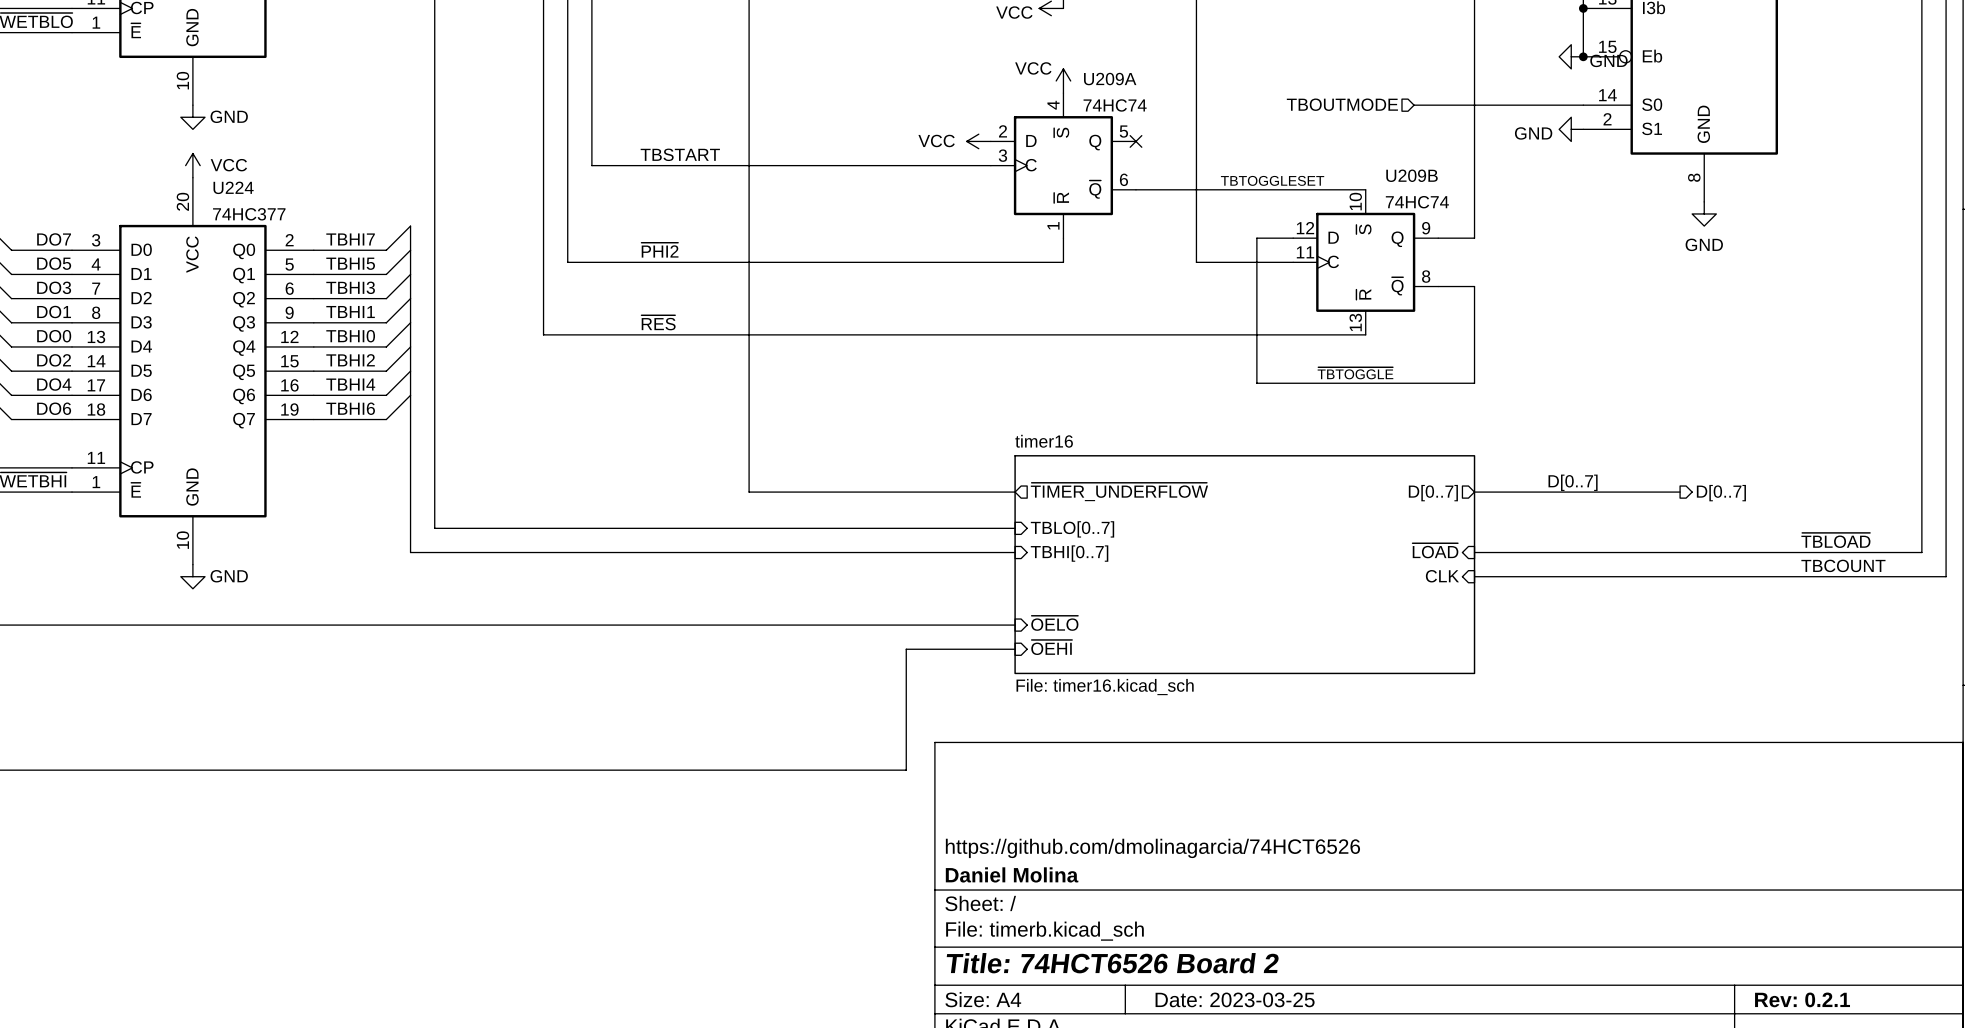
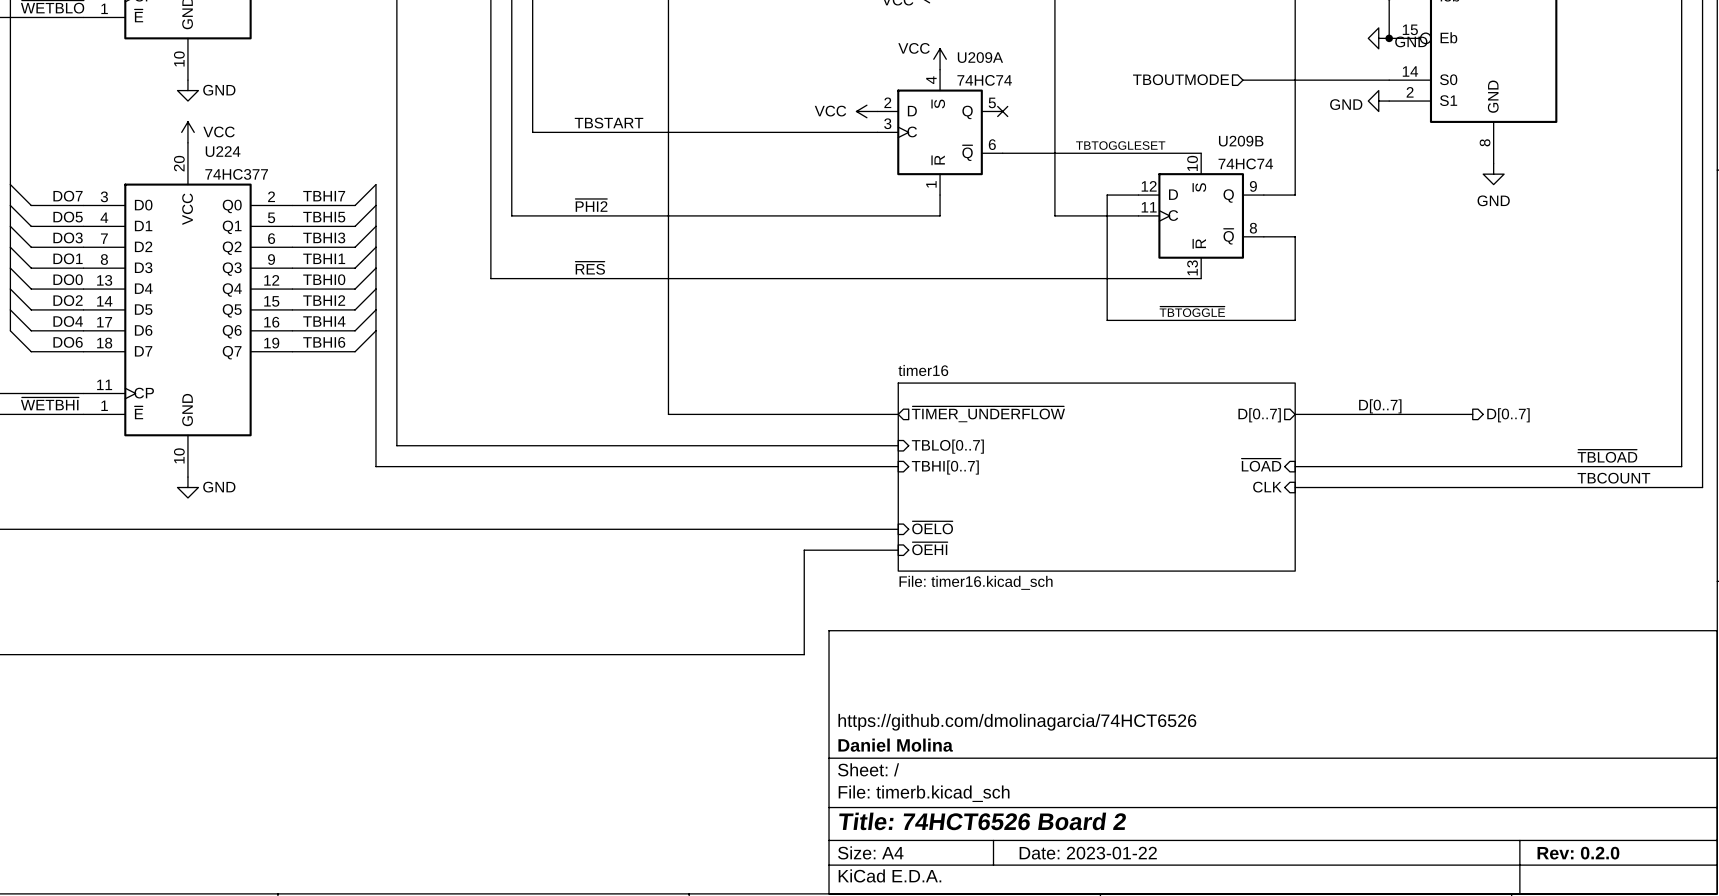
title block: Date: 2023-03-25 (1235, 999) -> Date: 2023-01-22 (1088, 853)
title block: Rev: 0.2.1 (1802, 999) -> Rev: 0.2.0 (1578, 853)

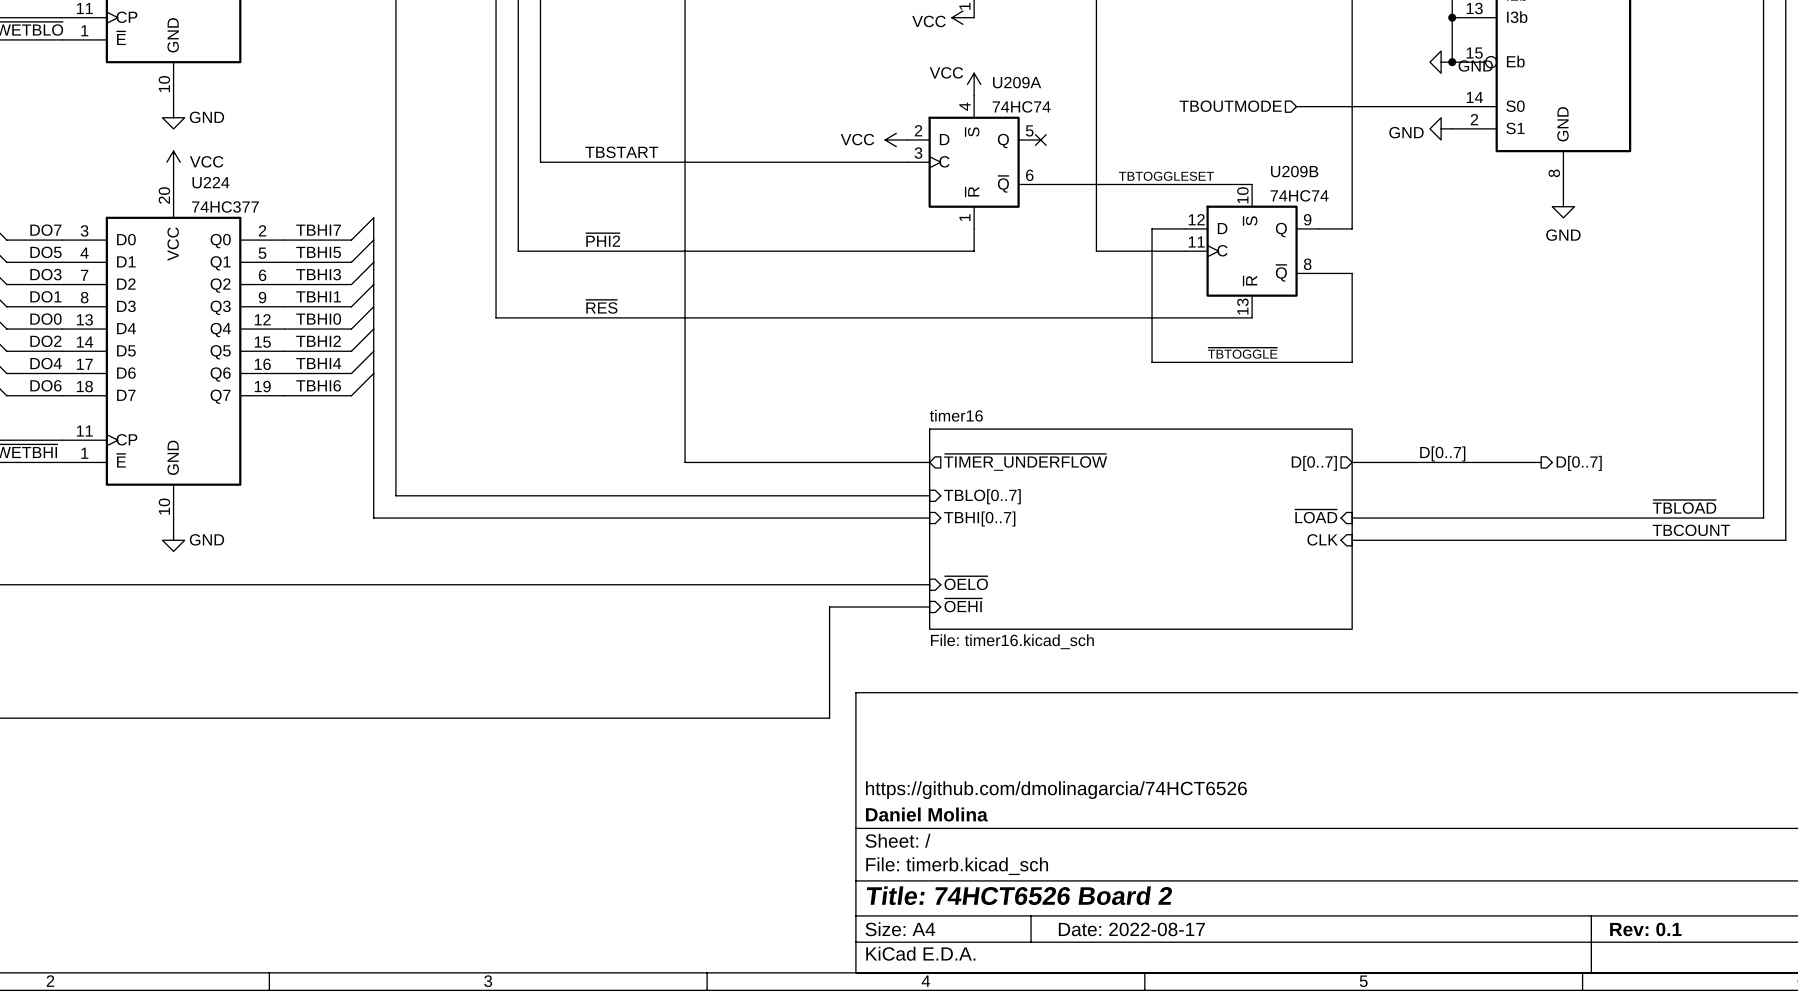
title block: Date: 2023-01-22 (1088, 853) -> Date: 2022-08-17 (1131, 929)
title block: Rev: 0.2.0 (1578, 853) -> Rev: 0.1 (1645, 929)

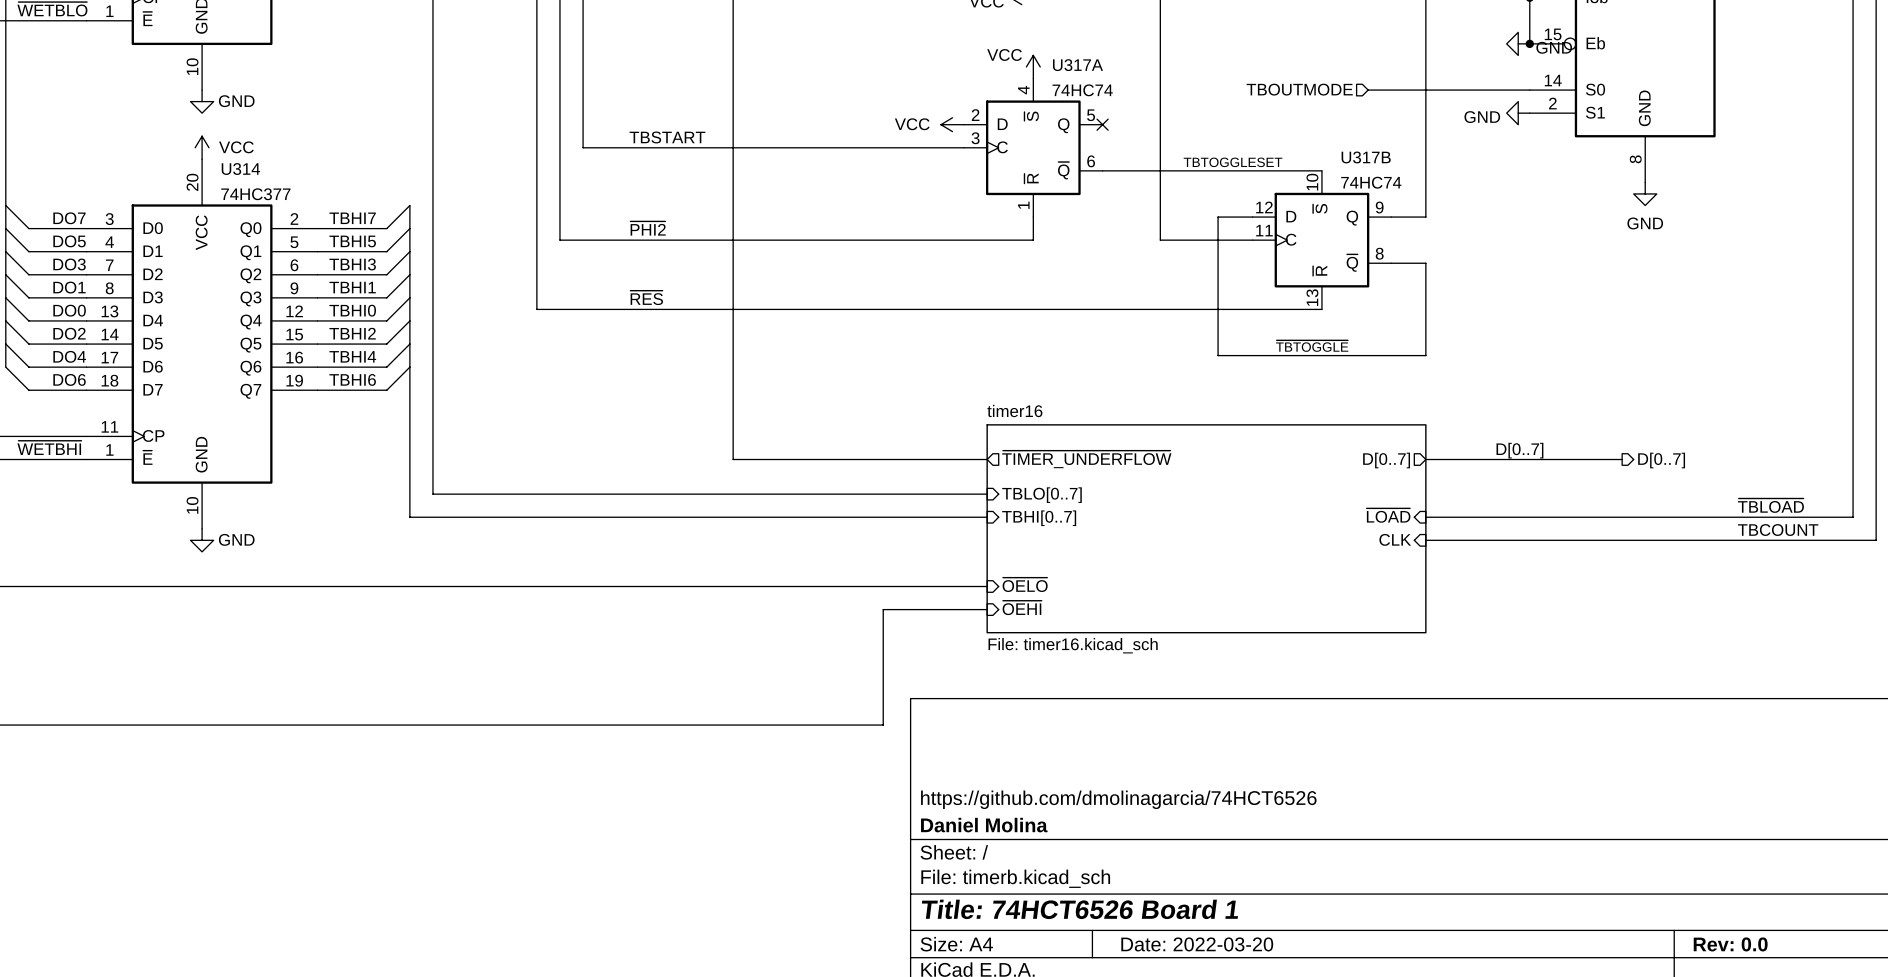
U209A name: U209A (1017, 82) -> U317A (1077, 65)
U209B name: U209B (1294, 171) -> U317B (1366, 157)
U224 name: U224 (210, 182) -> U314 (240, 169)
title block: Title: 74HCT6526 Board 2 (1019, 895) -> Title: 74HCT6526 Board 1 (1079, 909)
title block: Date: 2022-08-17 (1131, 929) -> Date: 2022-03-20 (1197, 944)
title block: Rev: 0.1 (1645, 929) -> Rev: 0.0 (1730, 944)

